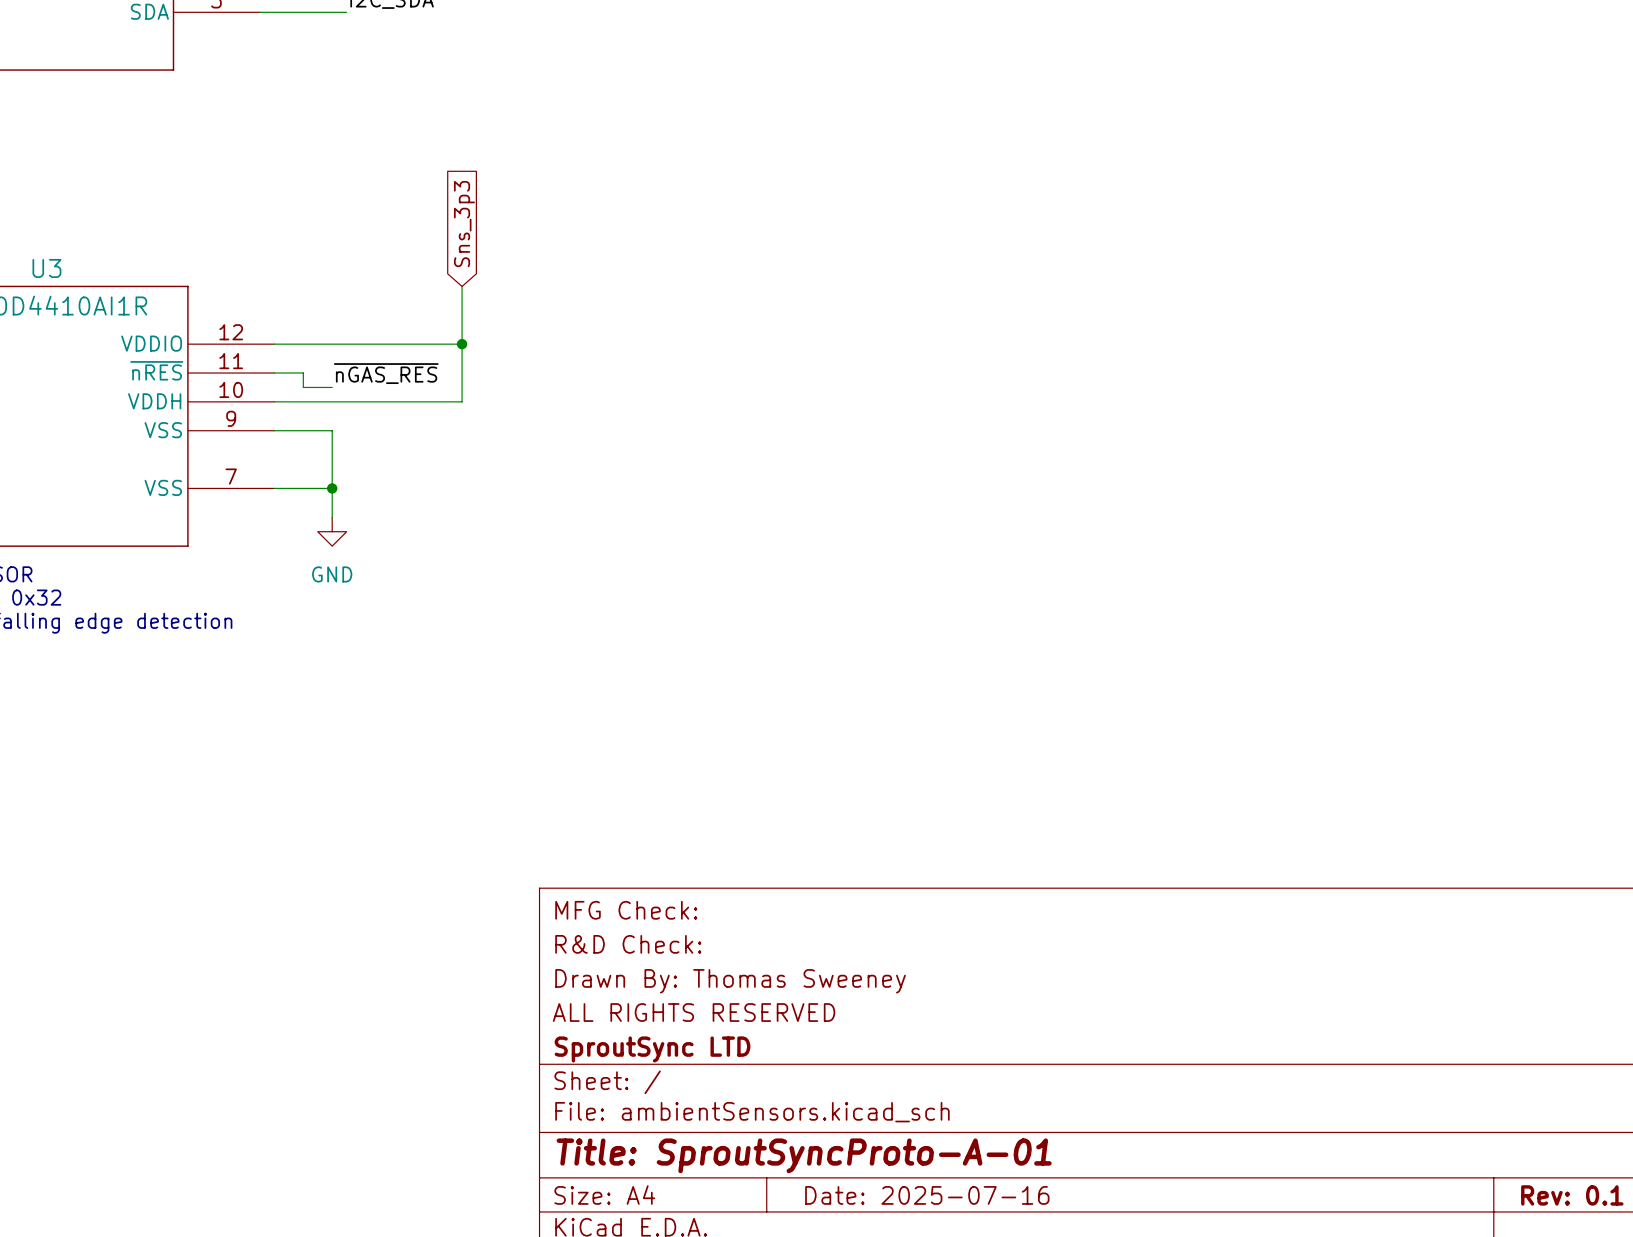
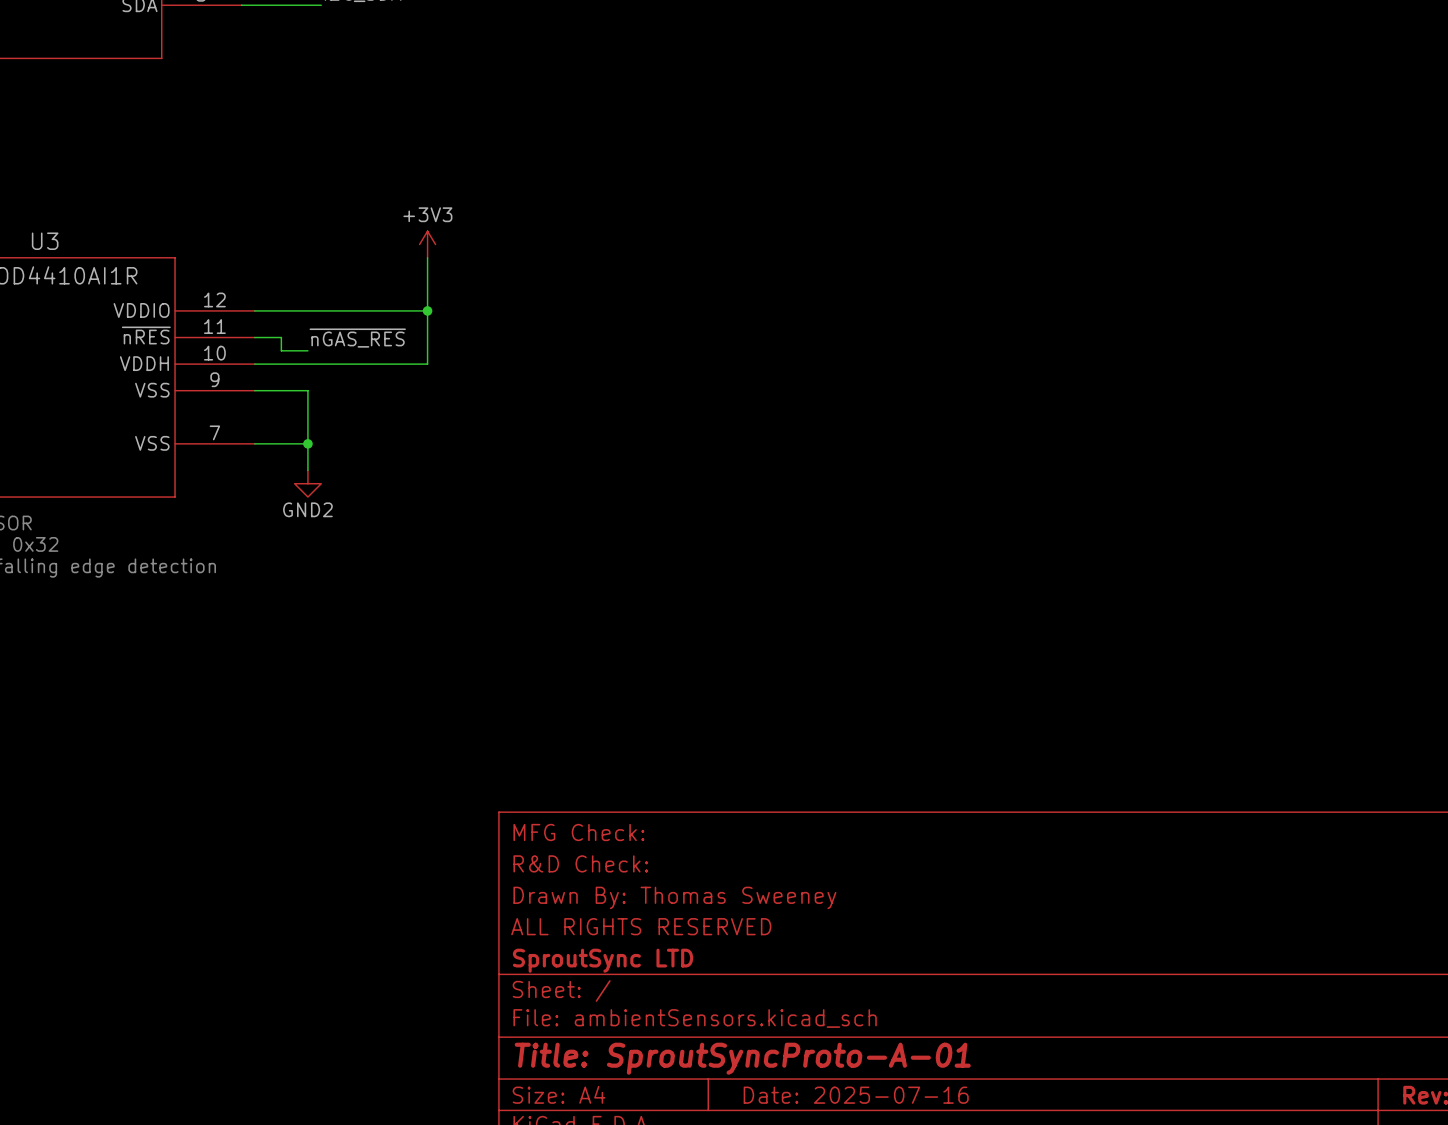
global label: Sns_3p3 (464, 224) -> none
power symbol: none -> +3V3 (427, 244)
power symbol: GND (332, 531) -> GND2 (307, 483)

